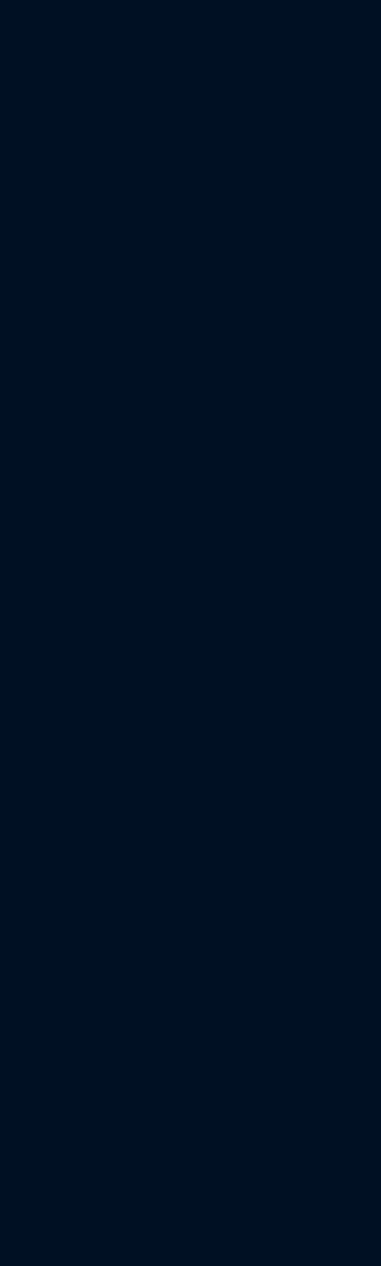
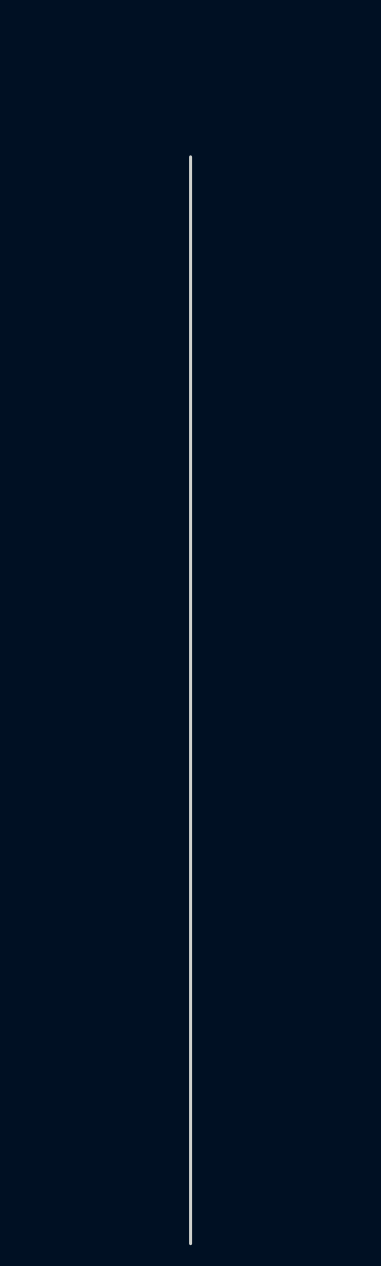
board edge: none -> (190, 156) (190, 1243)

